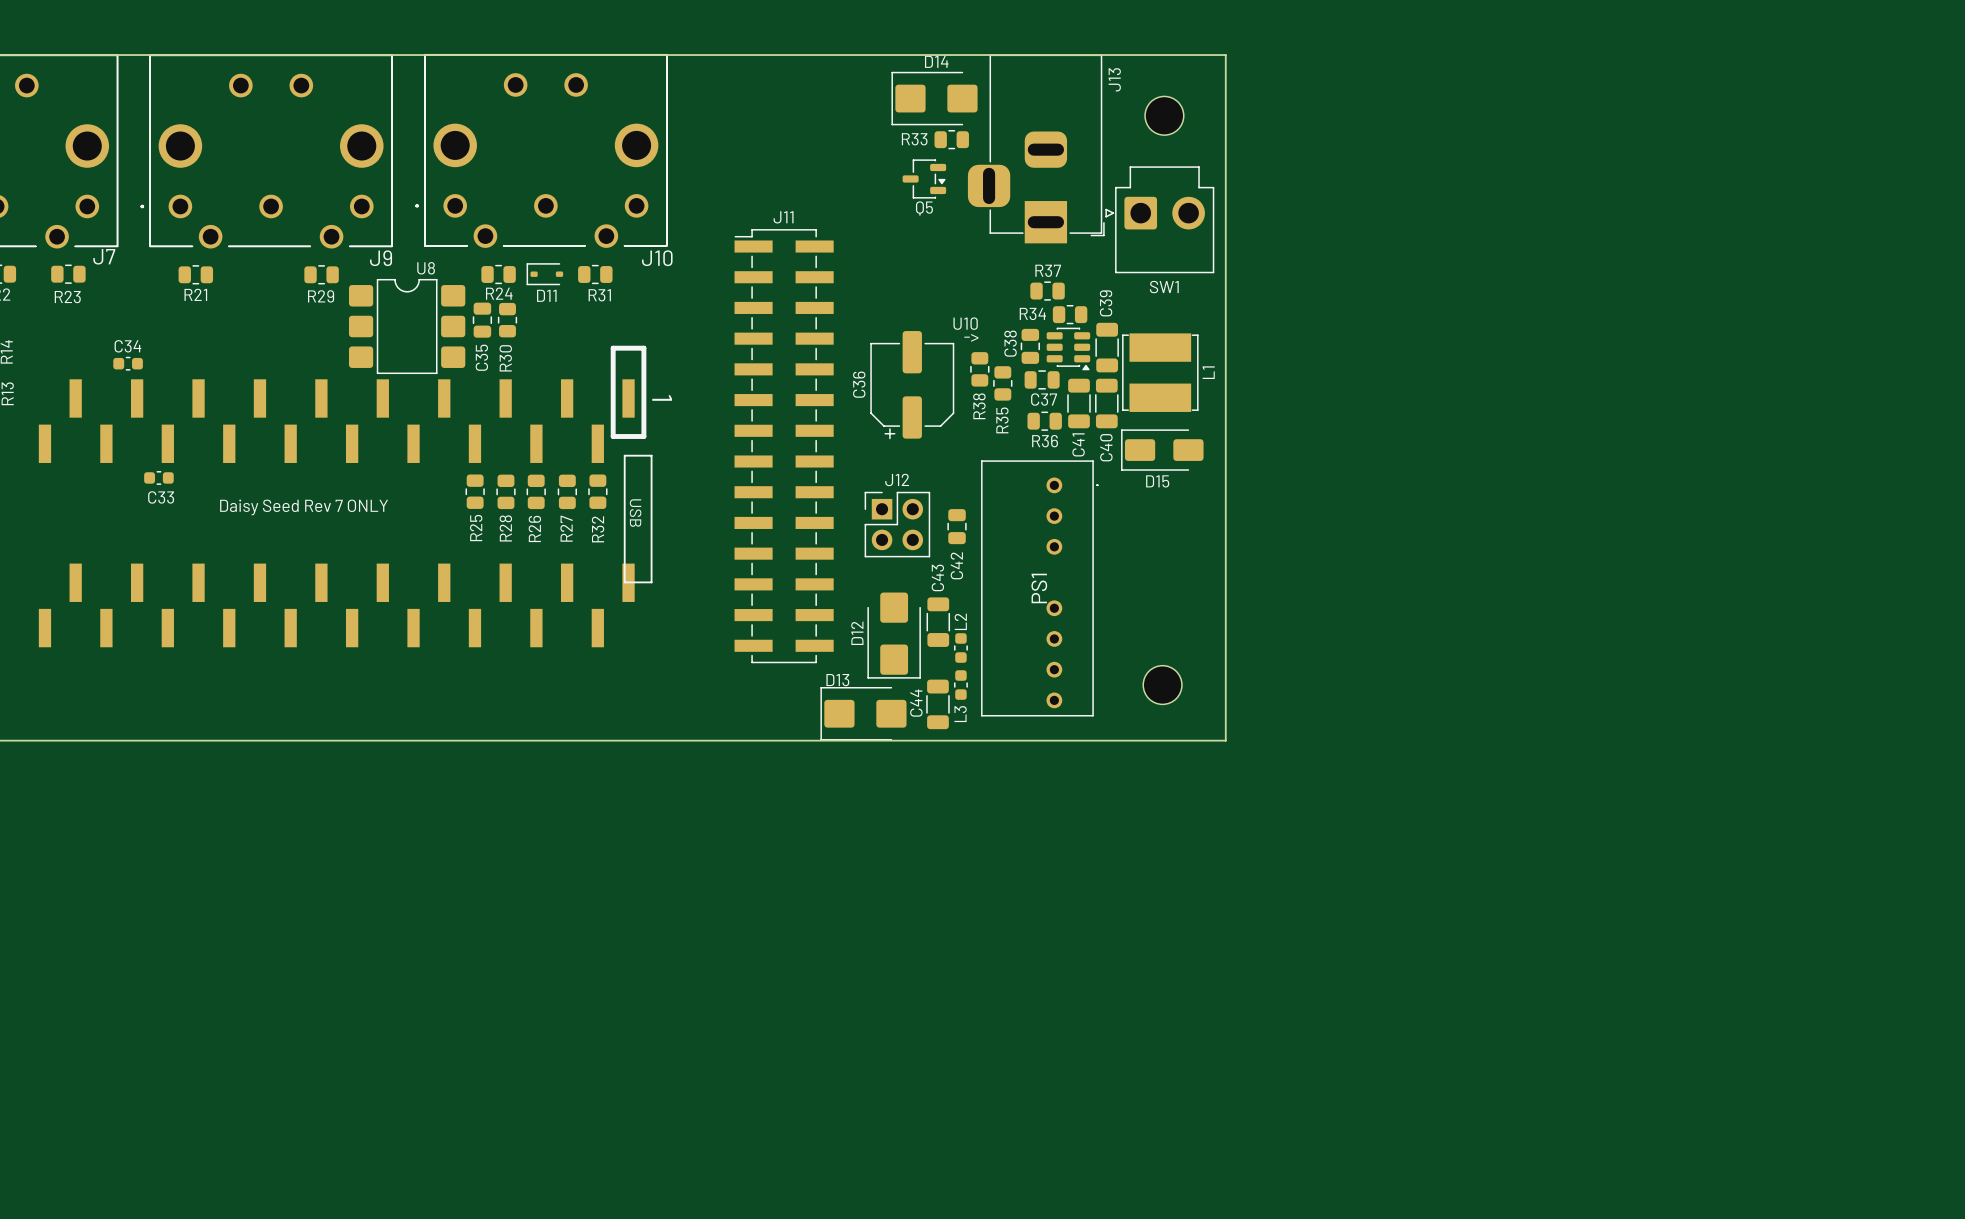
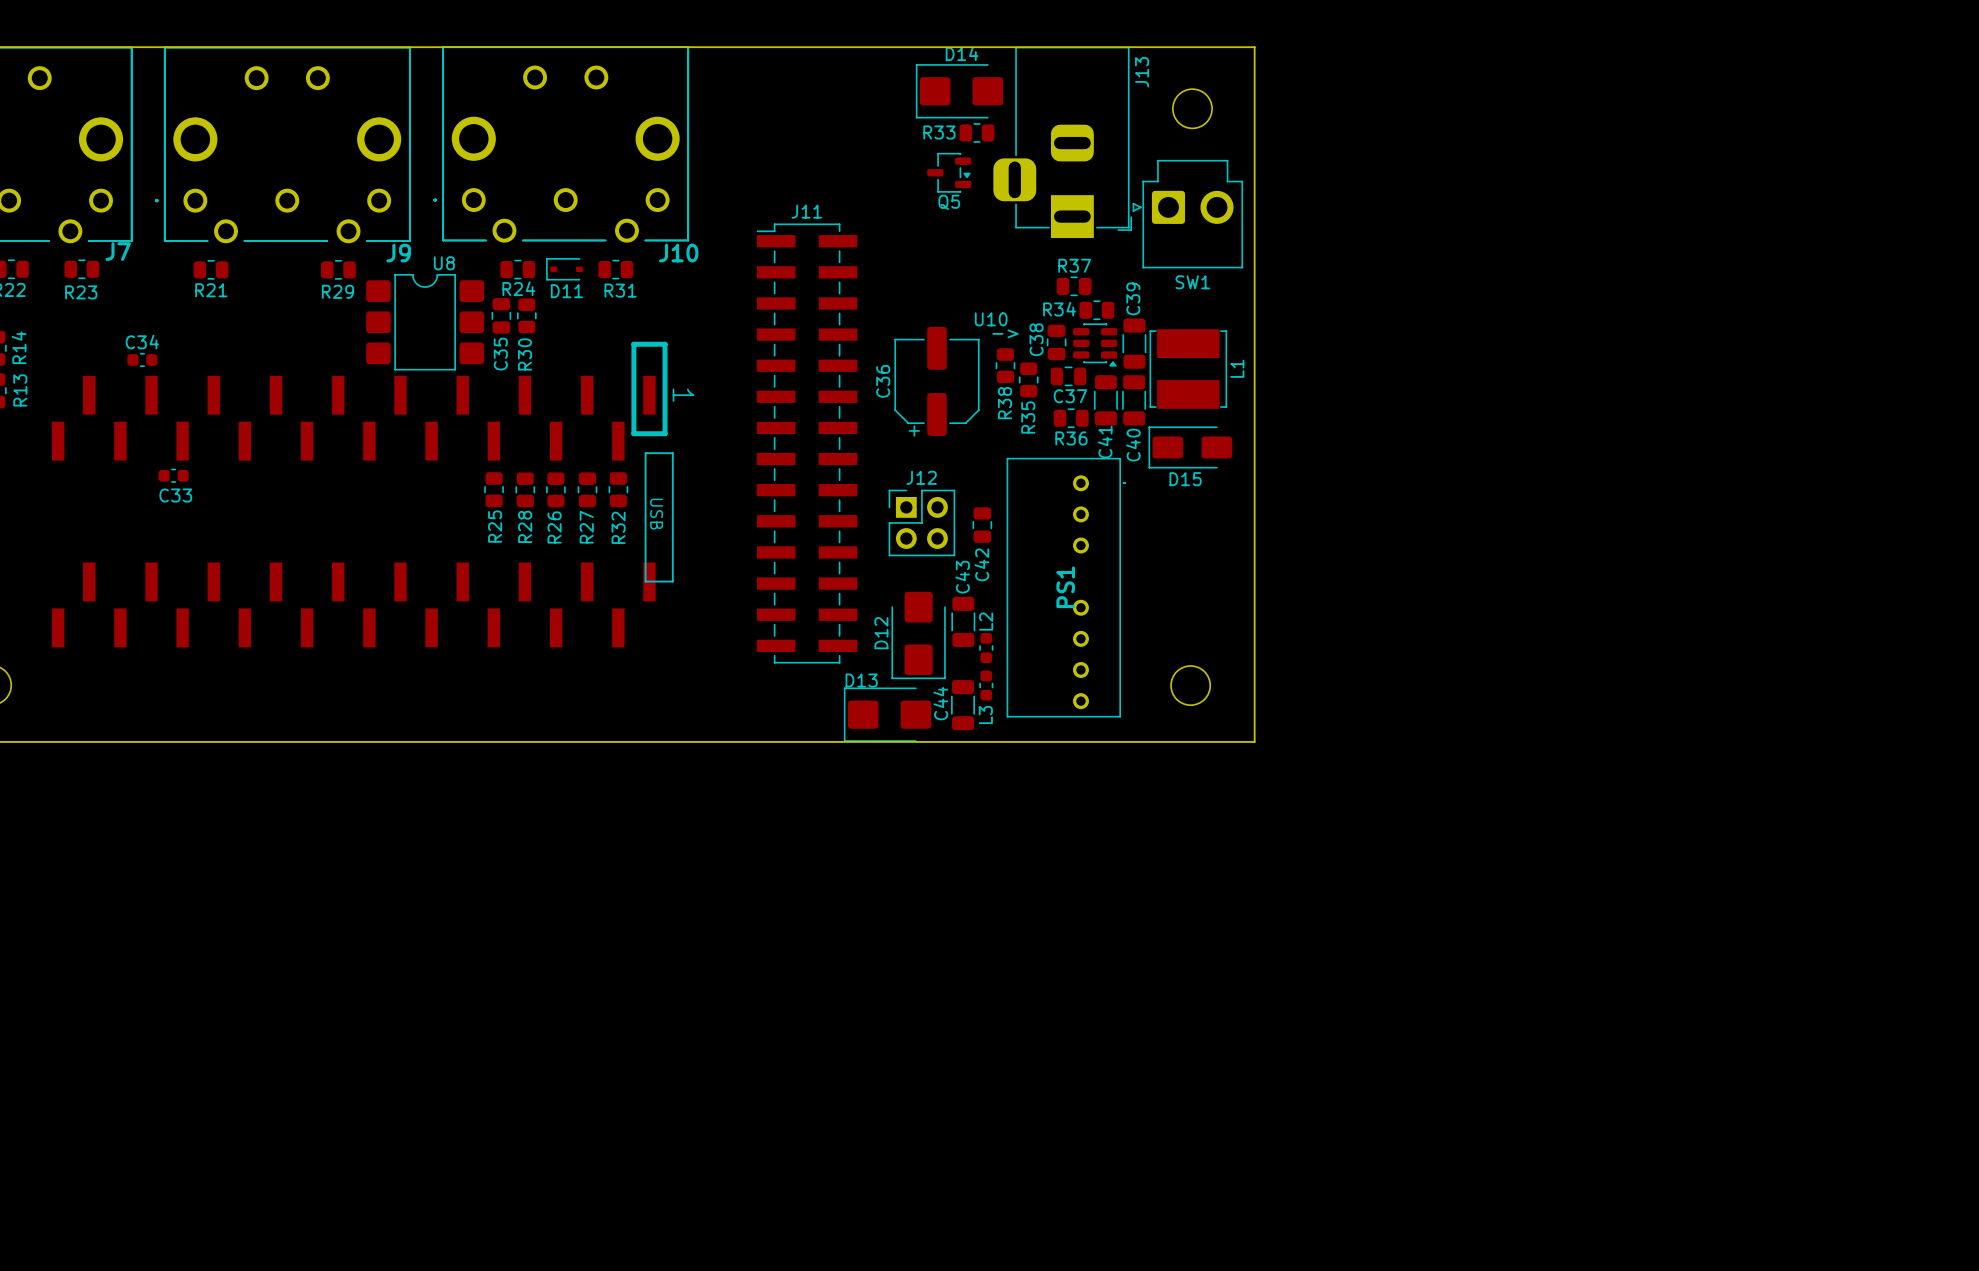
text: Daisy Seed Rev 7 ONLY (304, 507) -> none

